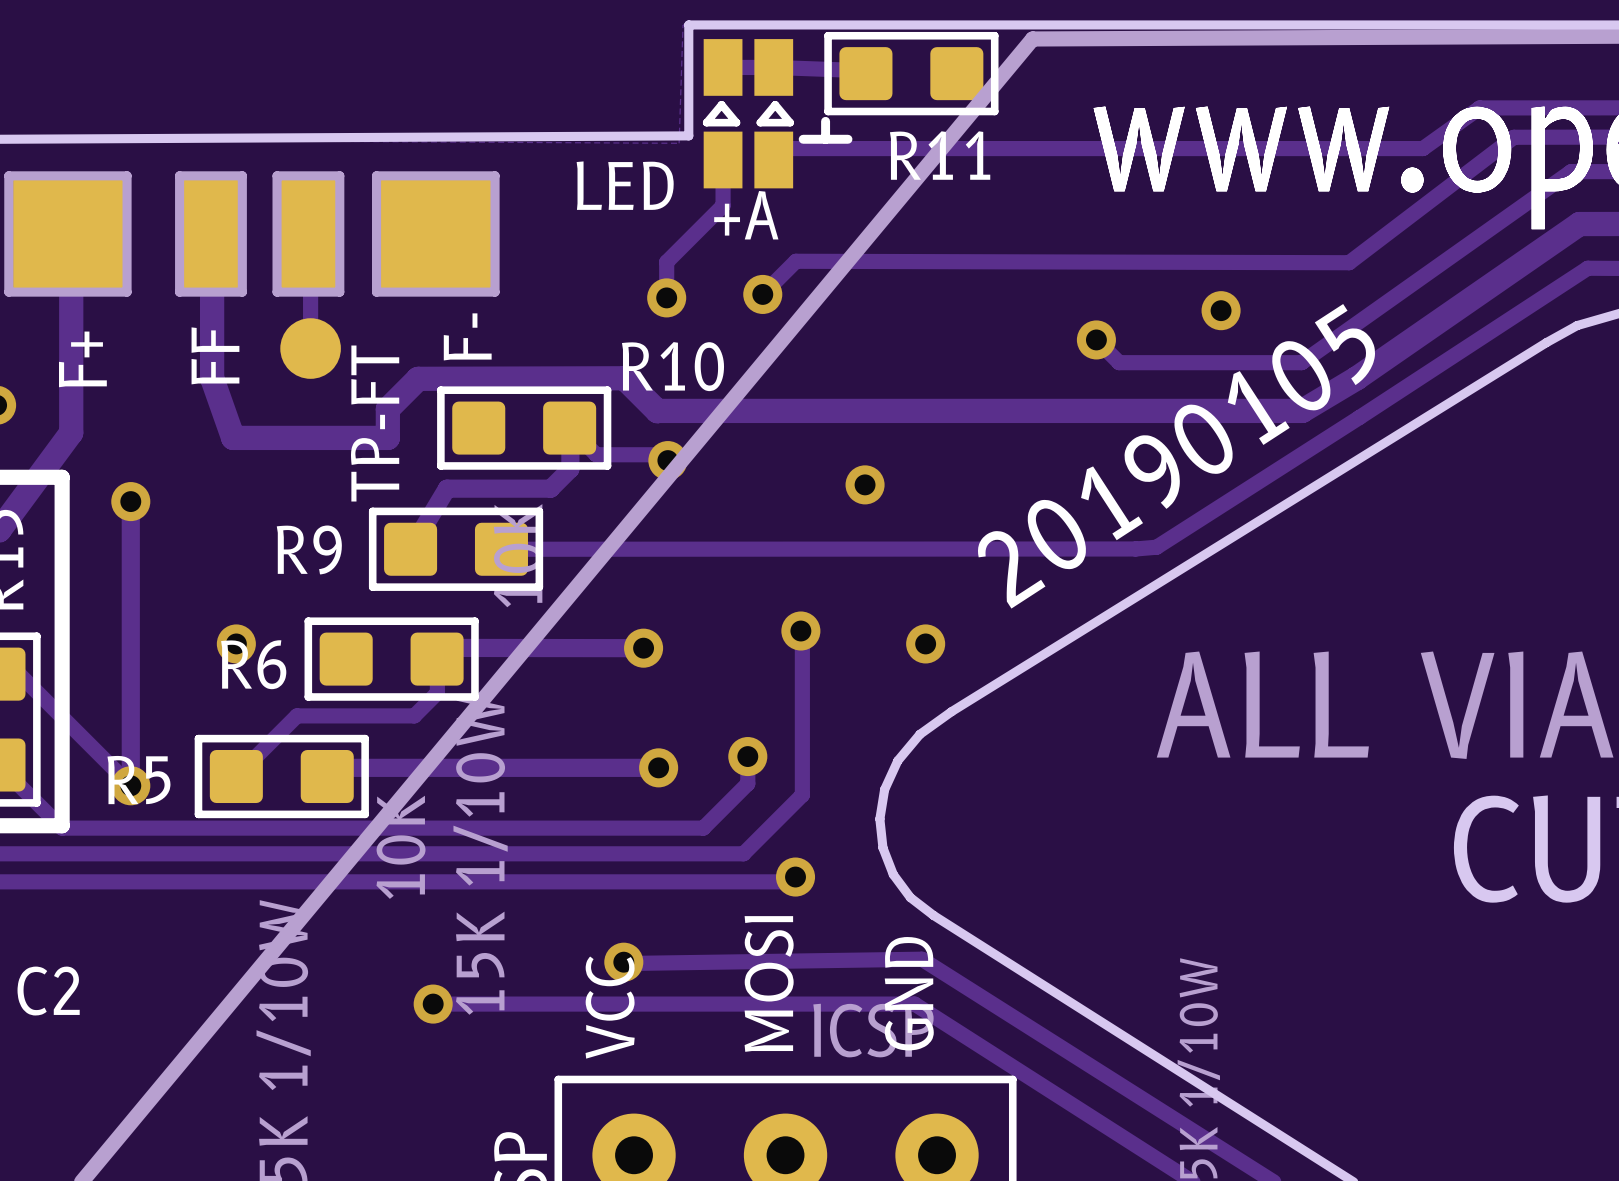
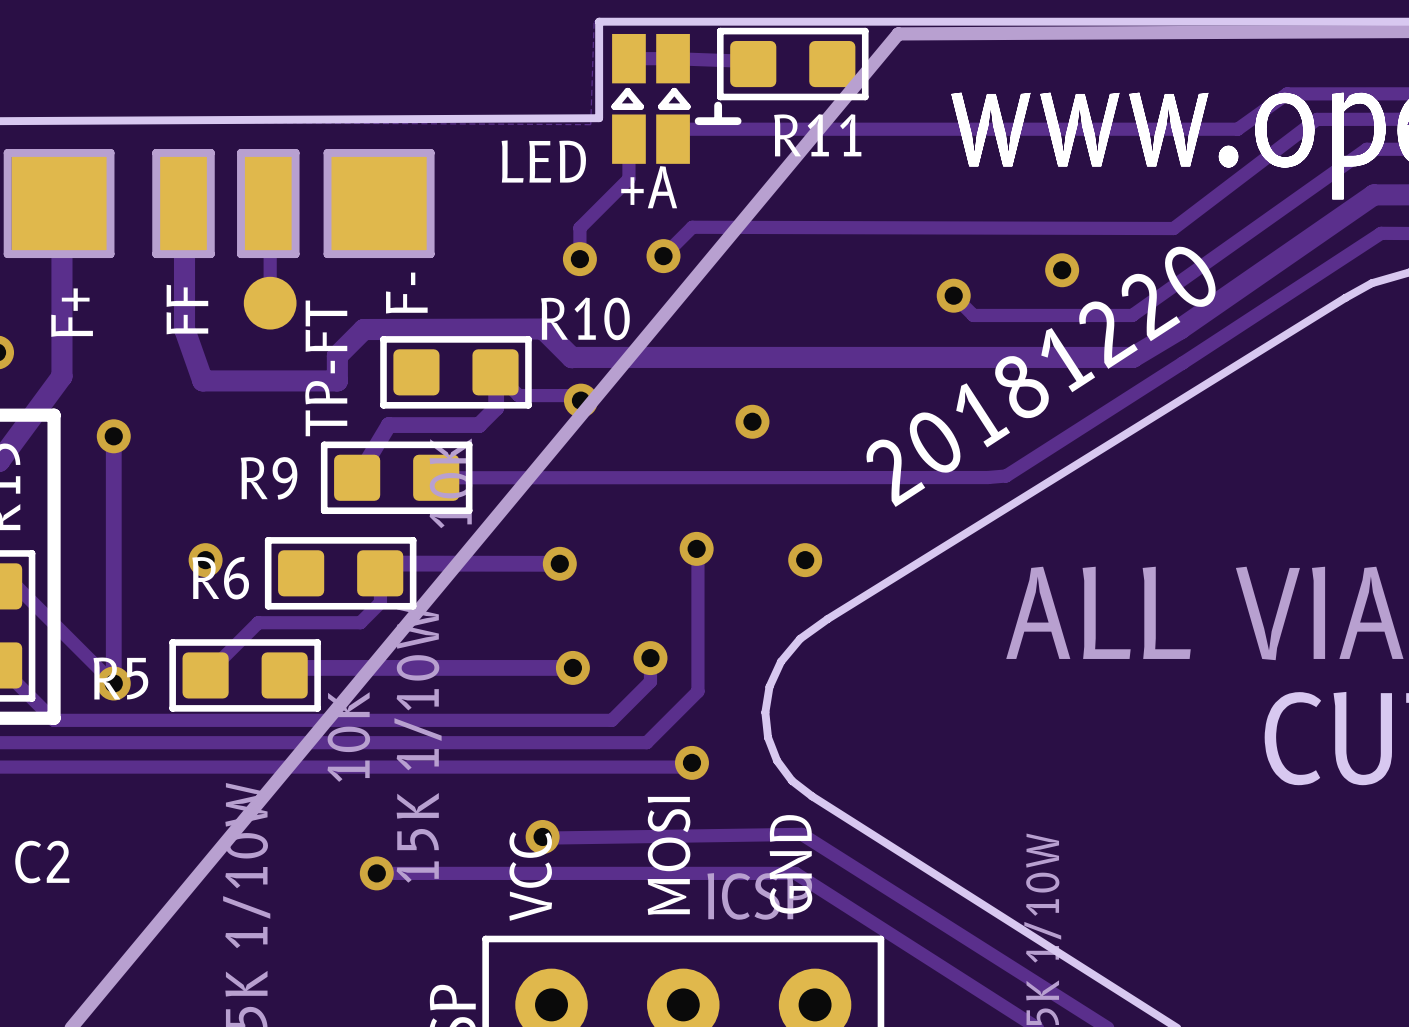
text: 20190105 (1176, 456) -> 20181220 (1041, 376)

